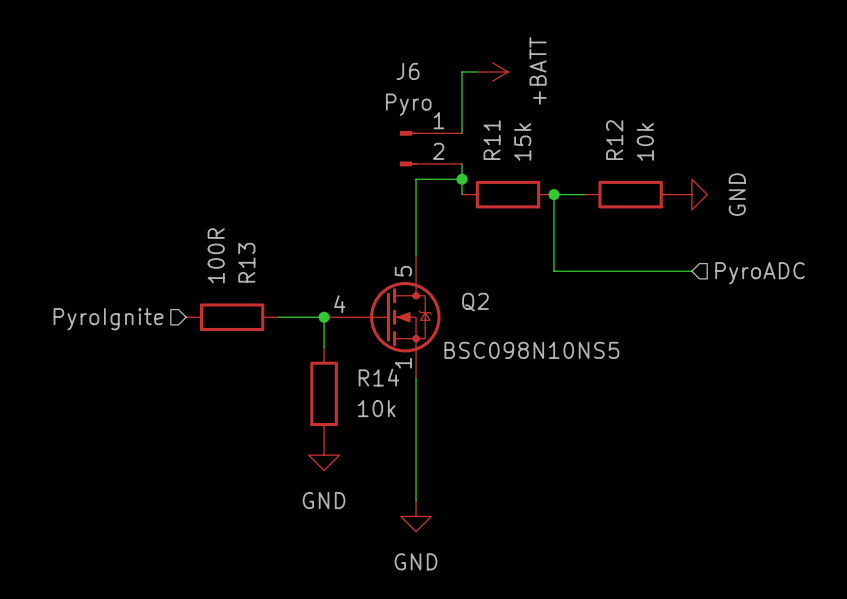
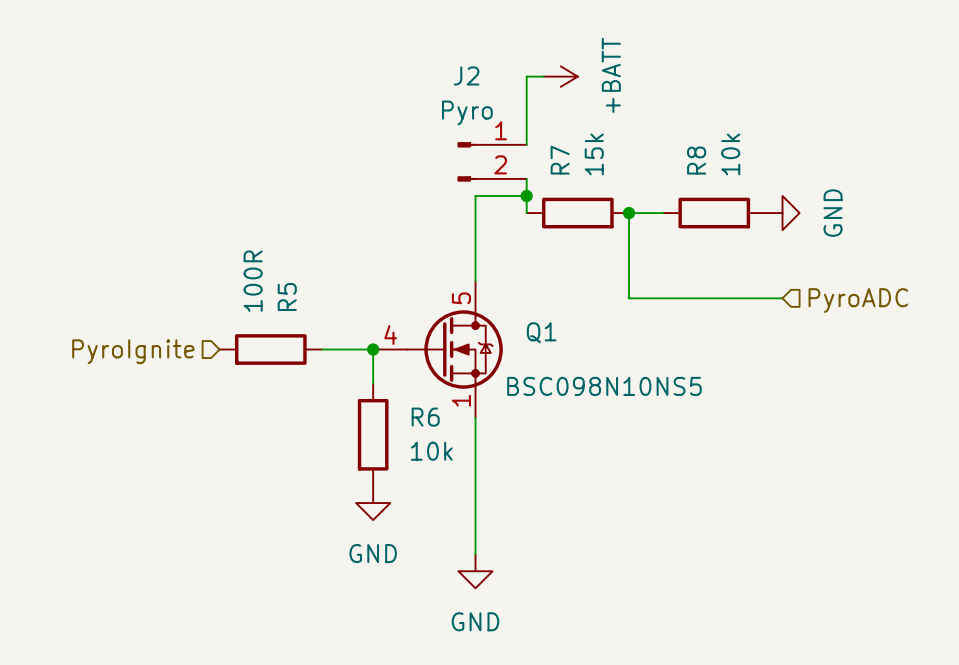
J6 name: J6 (408, 71) -> J2 (466, 75)
R11 name: R11 (492, 140) -> R7 (560, 160)
R12 name: R12 (614, 140) -> R8 (696, 160)
R13 name: R13 (246, 262) -> R5 (287, 297)
Q2 name: Q2 (475, 302) -> Q1 (541, 332)
R14 name: R14 (378, 377) -> R6 (425, 417)

